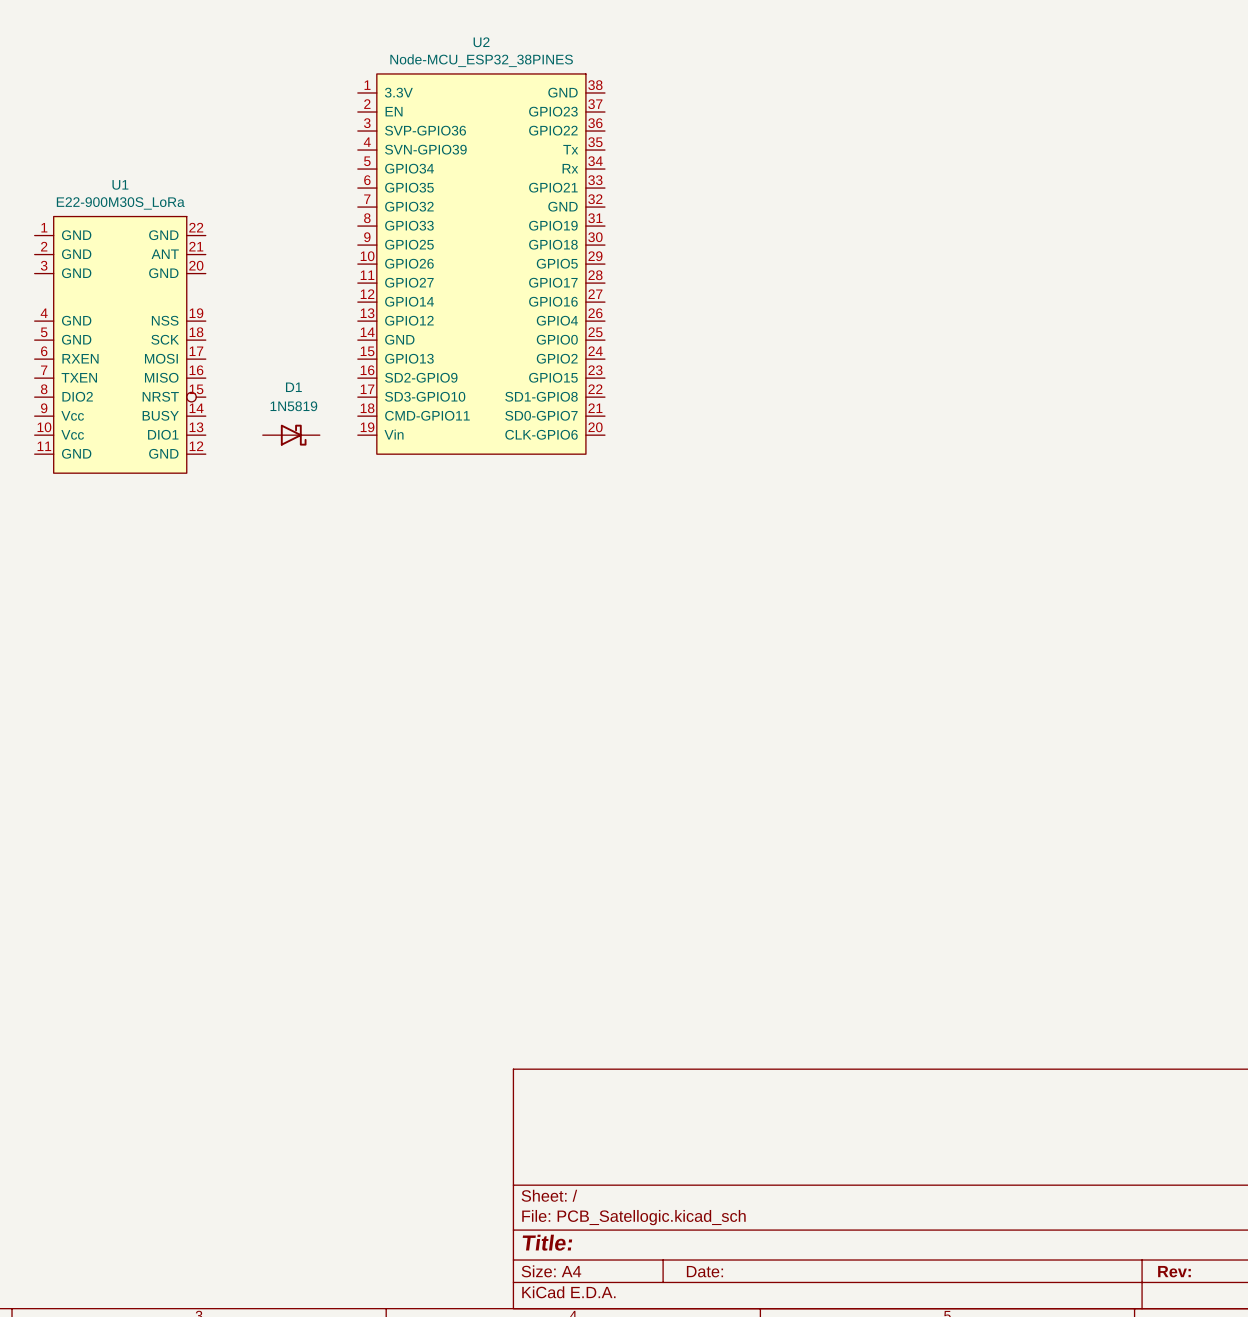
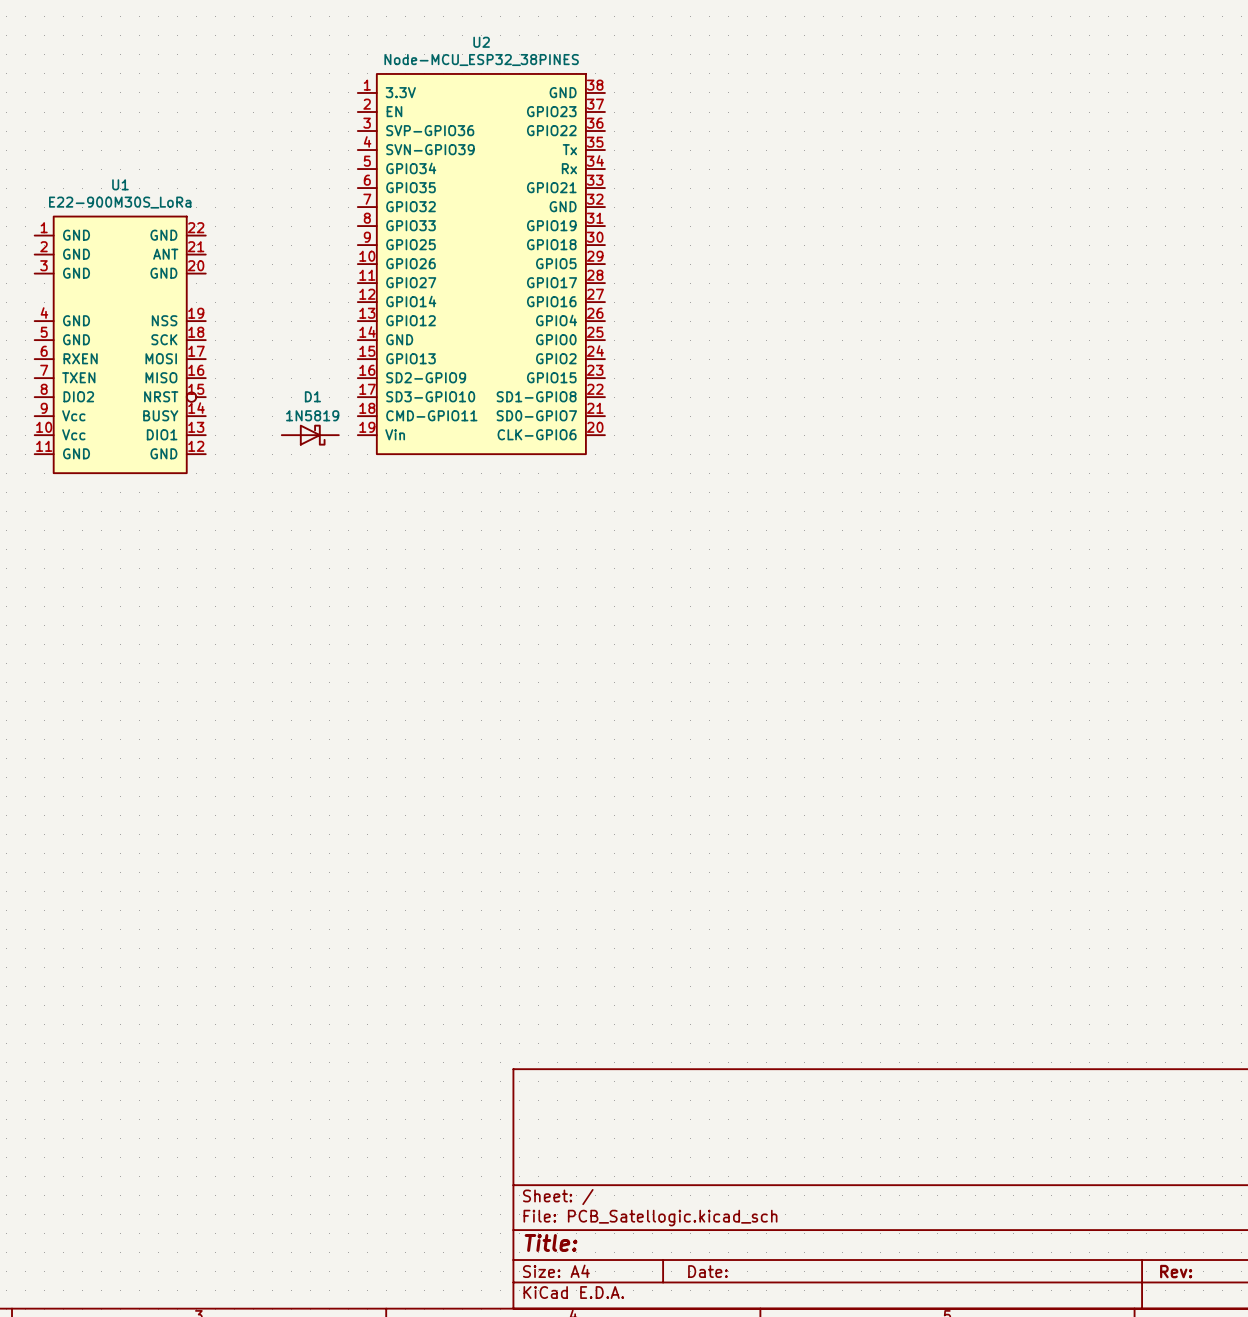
D1 name position: D1 (293, 387) -> D1 (312, 396)
D1 value position: 1N5819 (293, 406) -> 1N5819 (312, 415)
D1 position: (291, 435) -> (310, 435)

